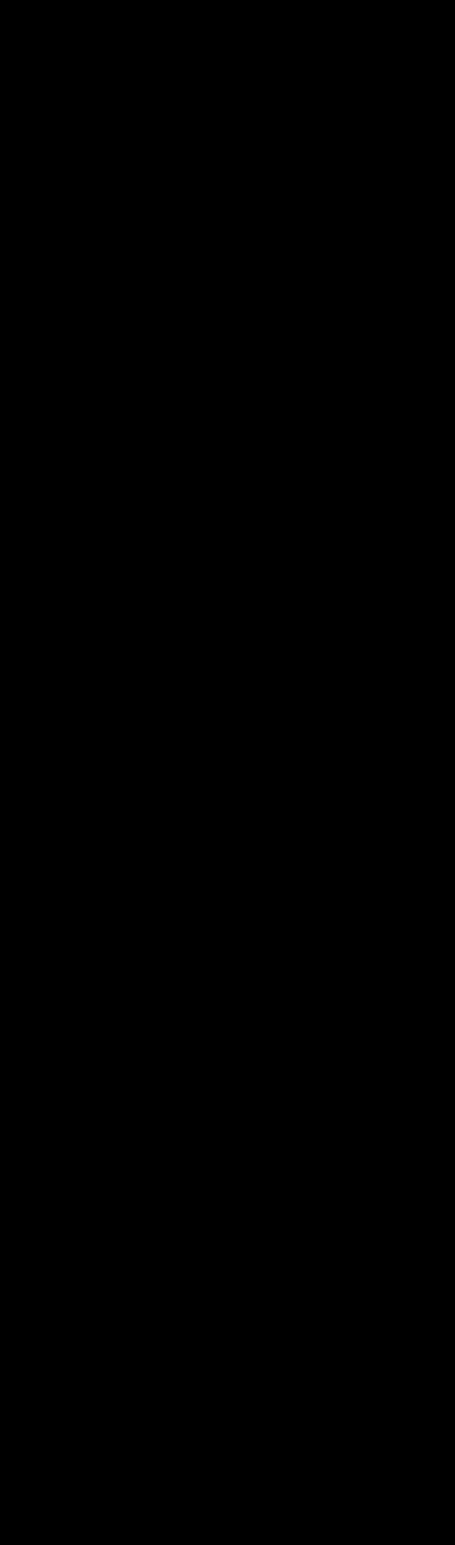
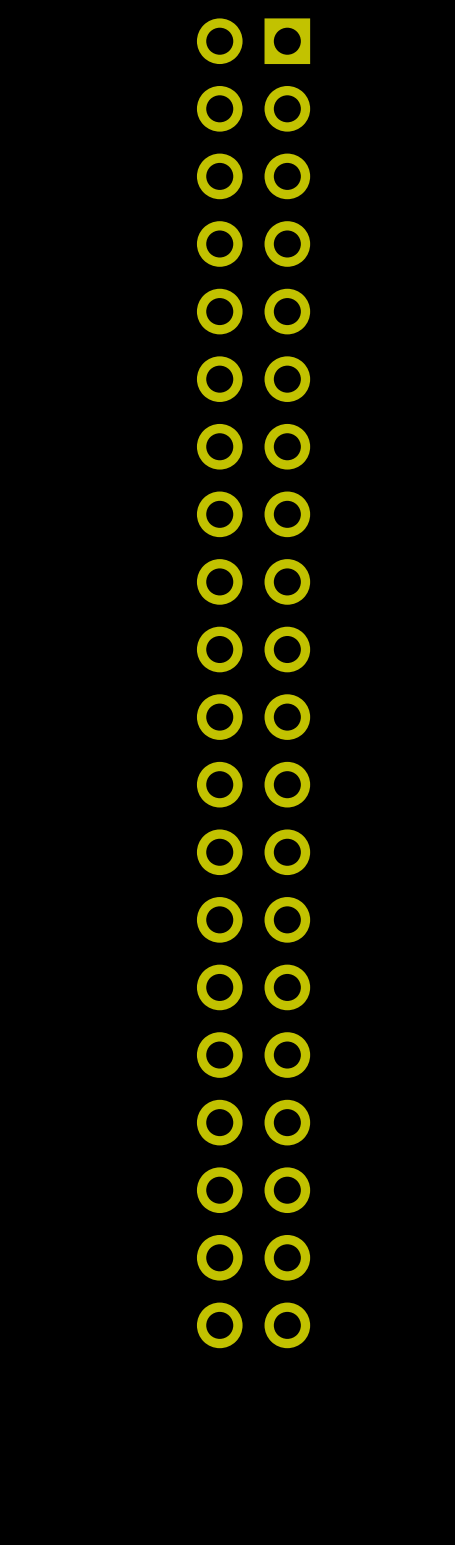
part: none -> (253, 683)

